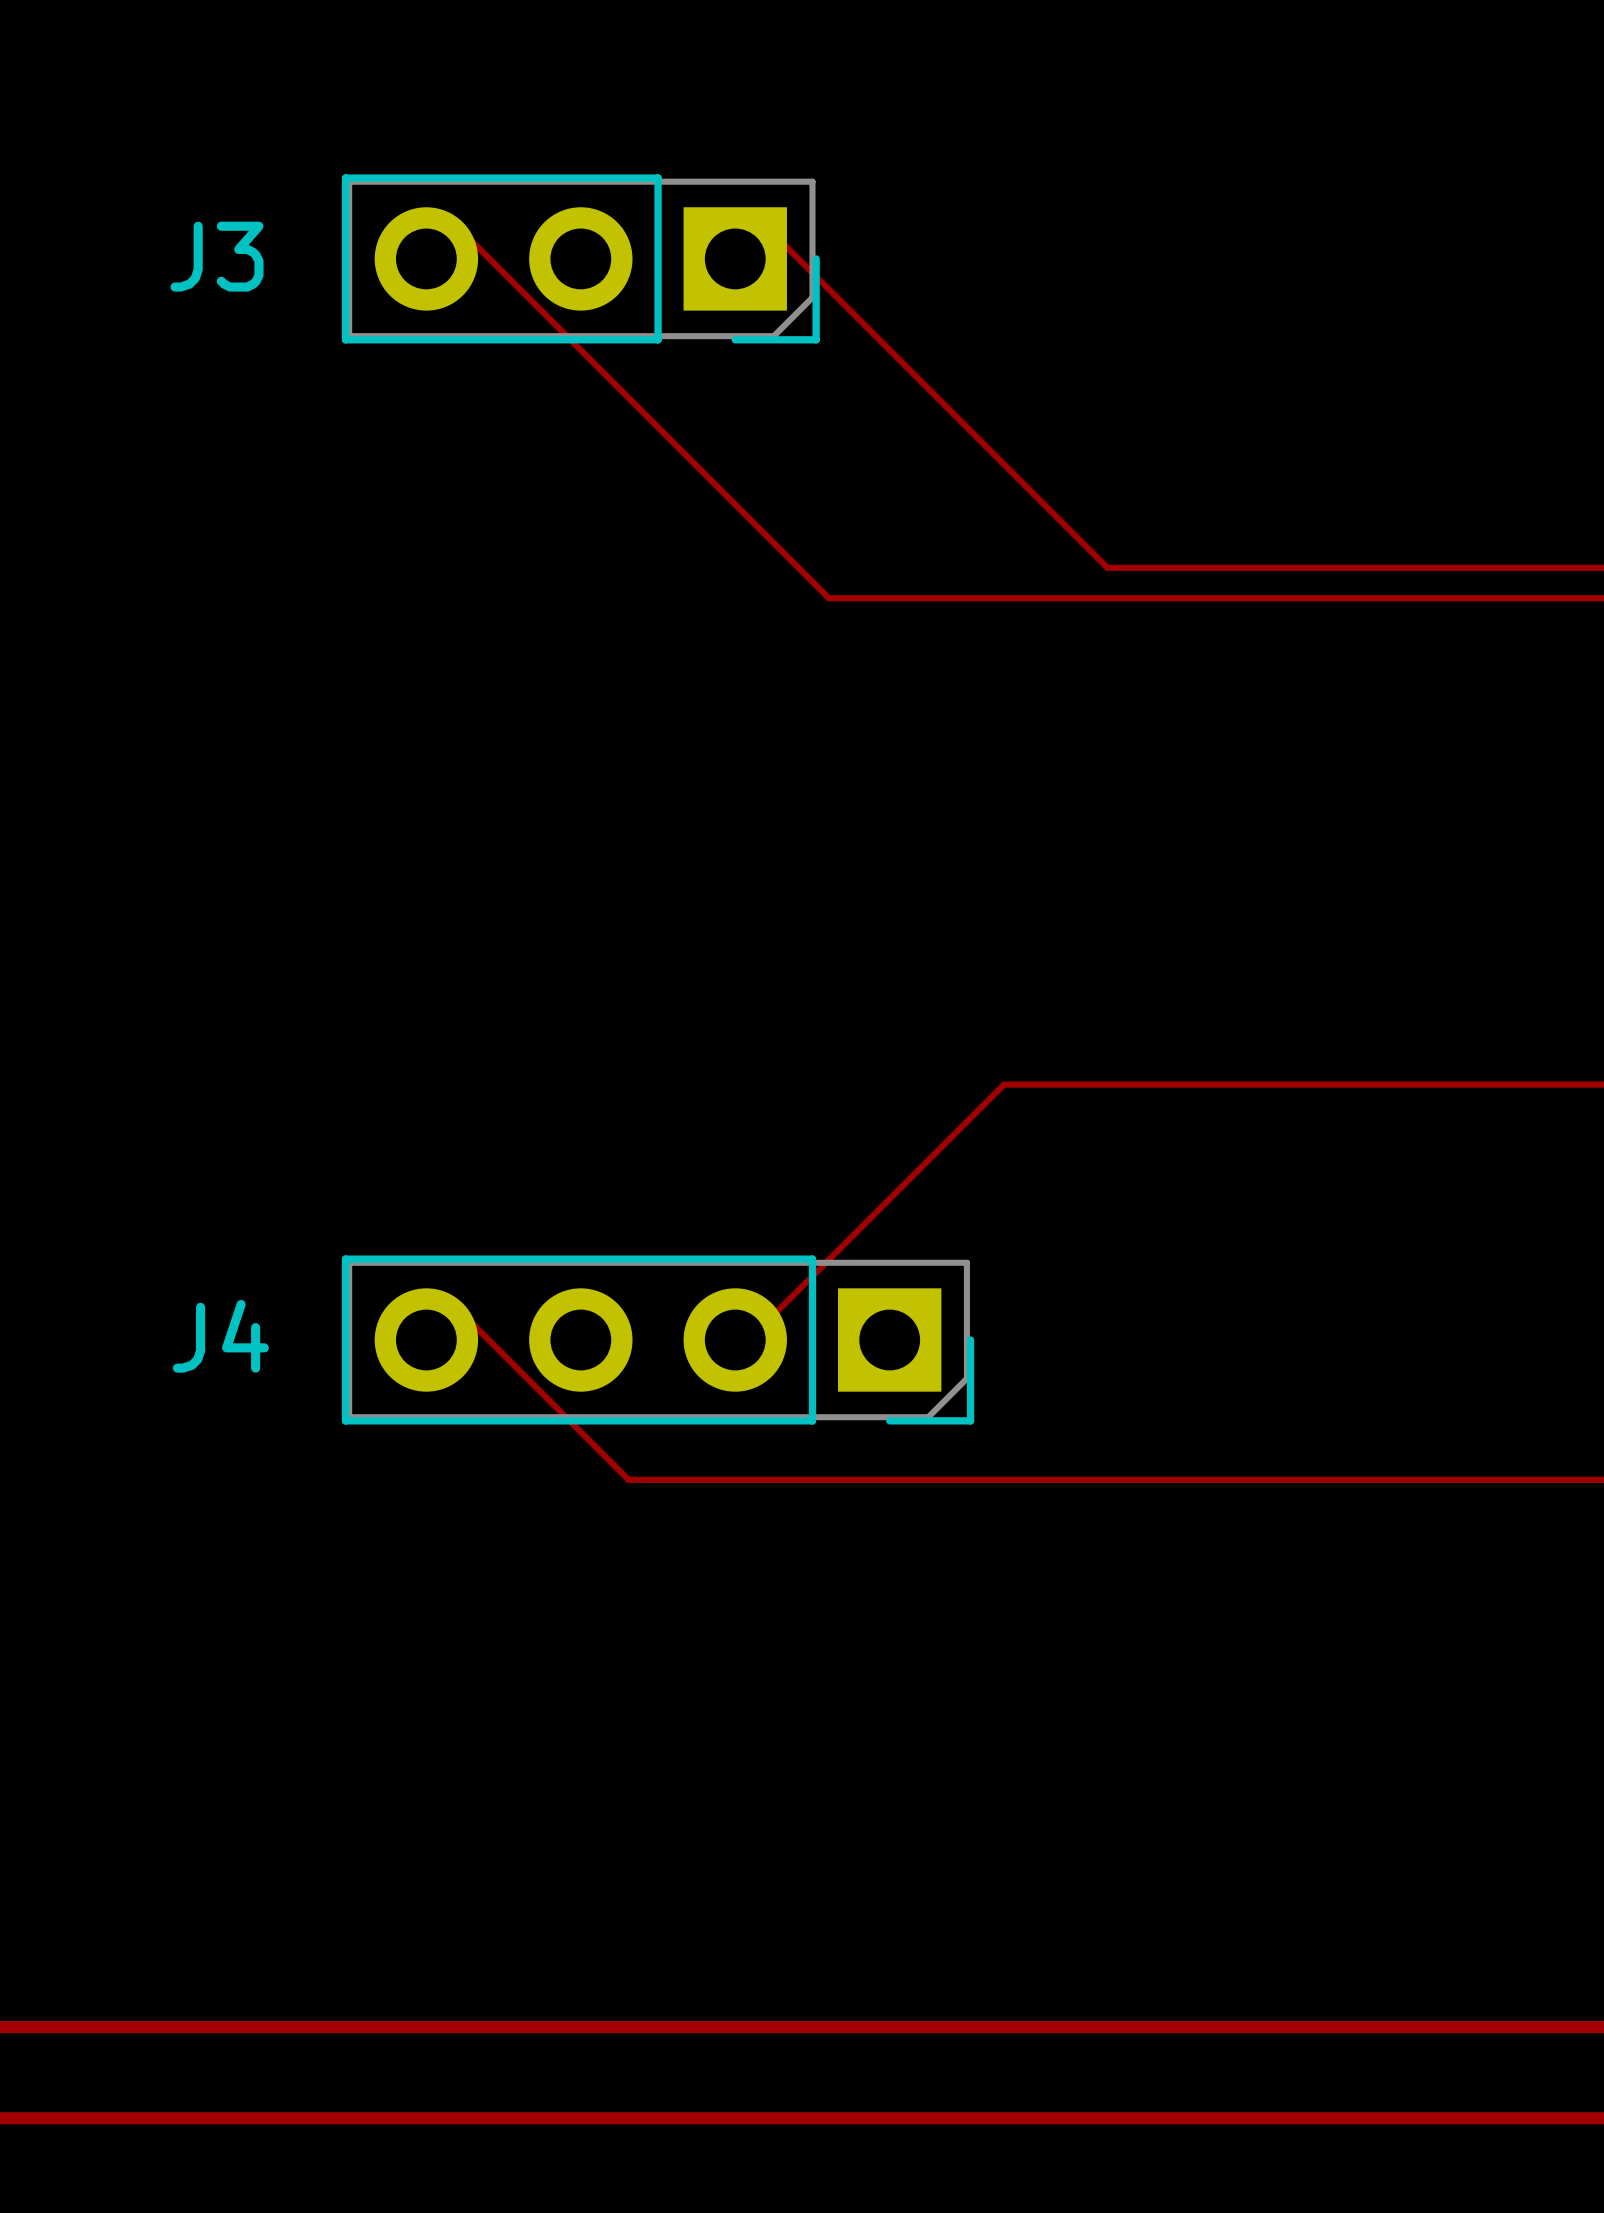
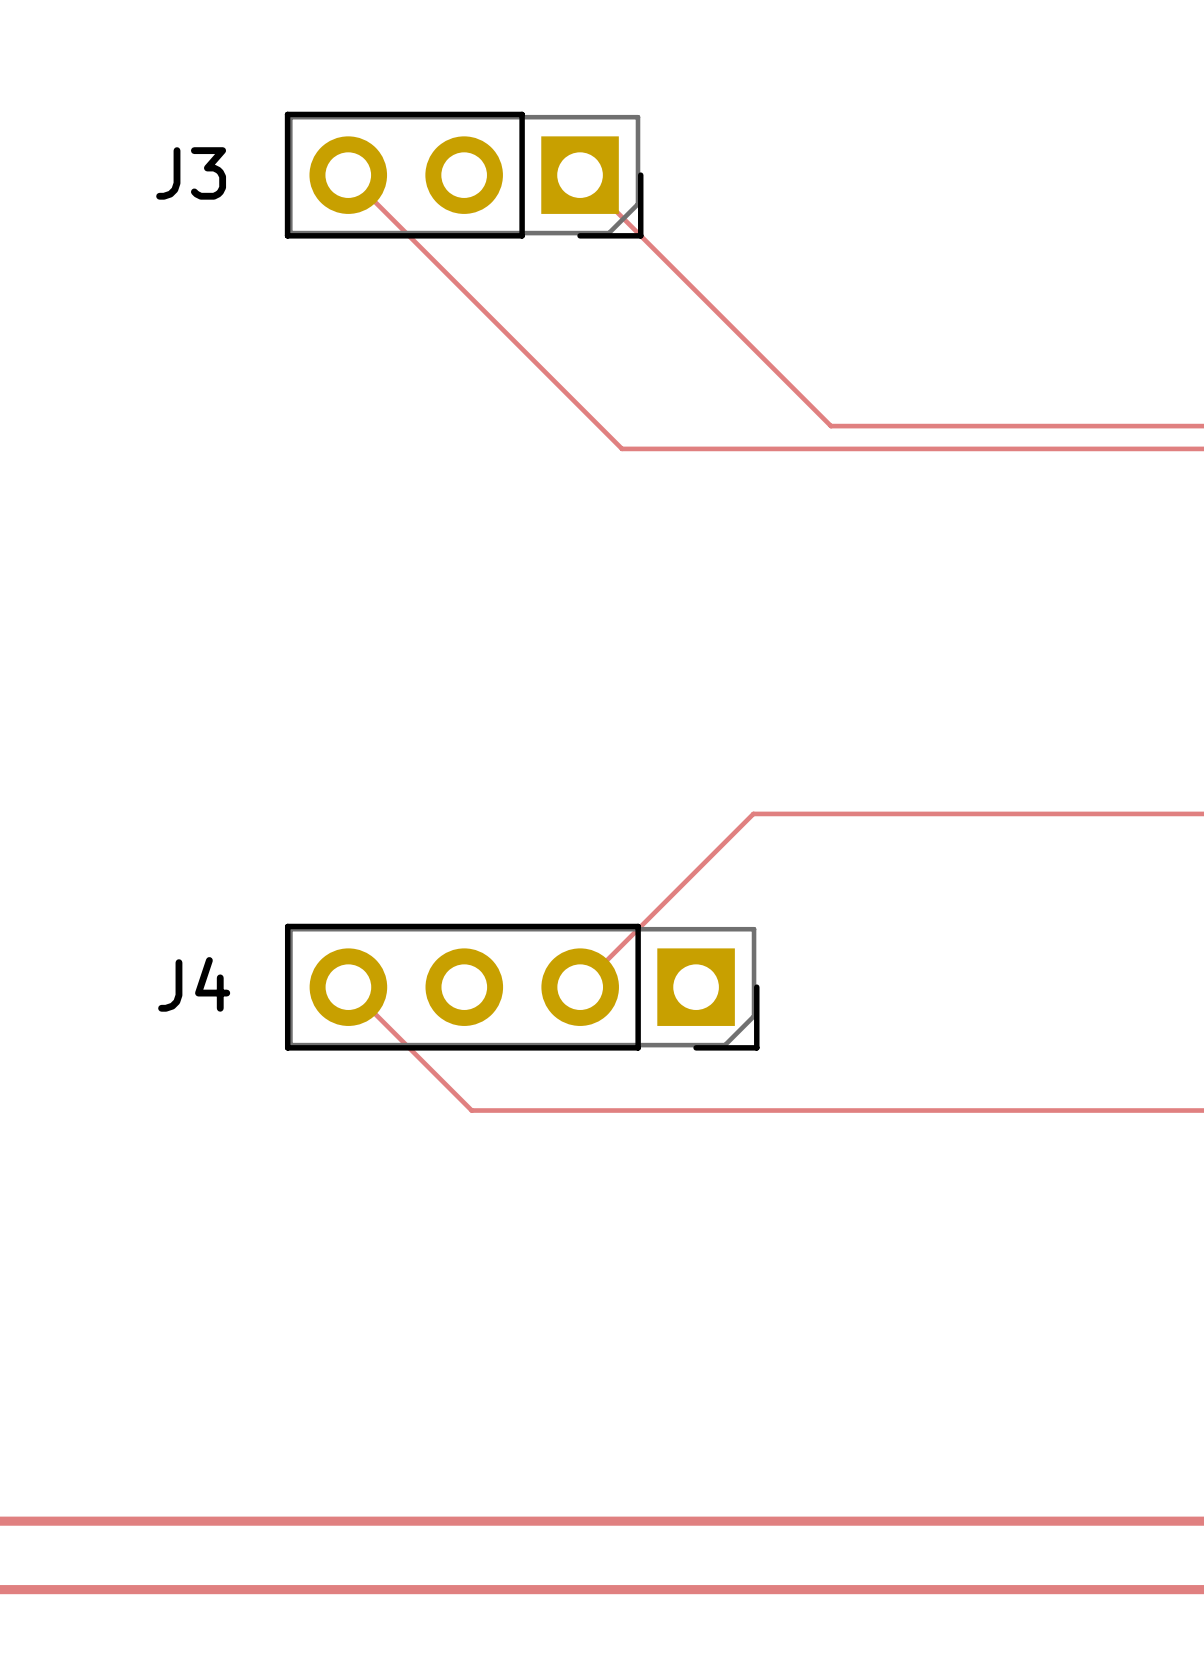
J3 position: (580, 258) -> (464, 175)
J4 position: (658, 1340) -> (522, 987)

